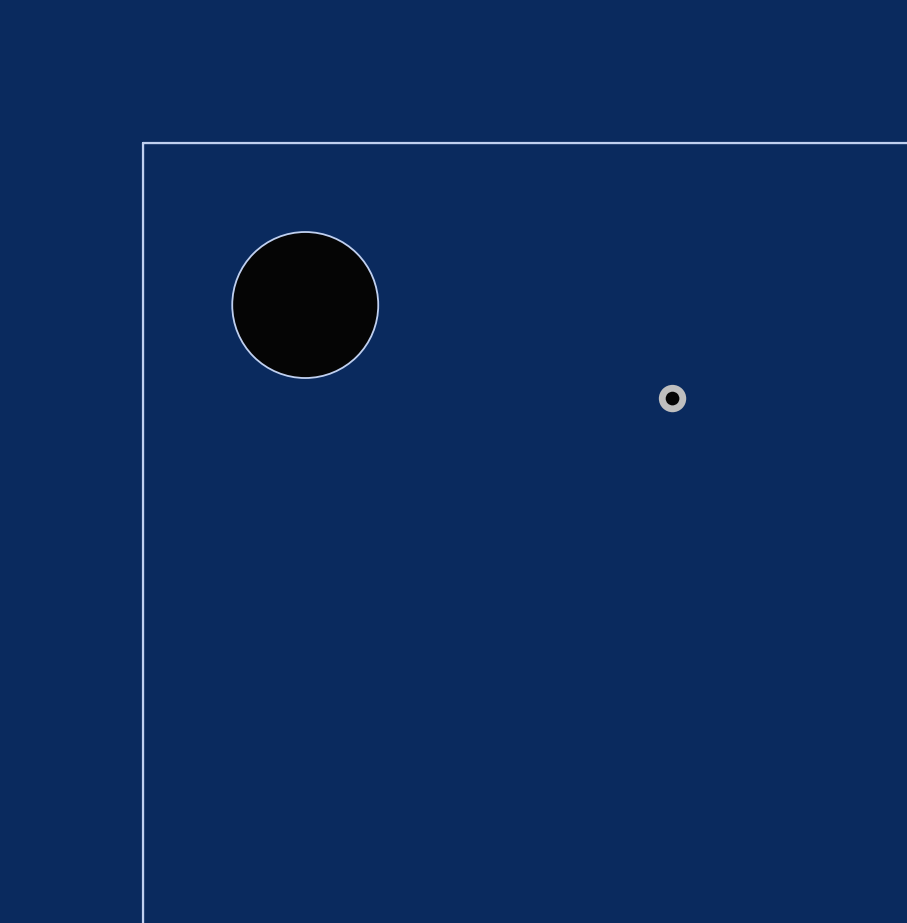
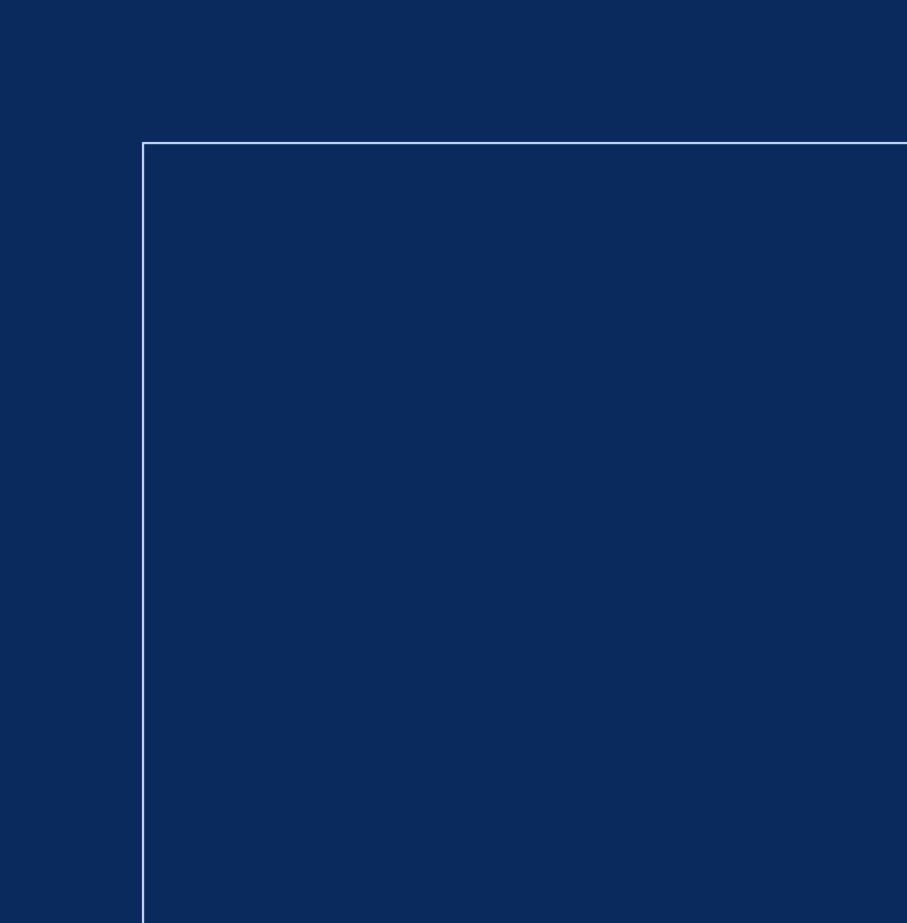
part: (305, 305) -> none
via: (672, 398) -> none

